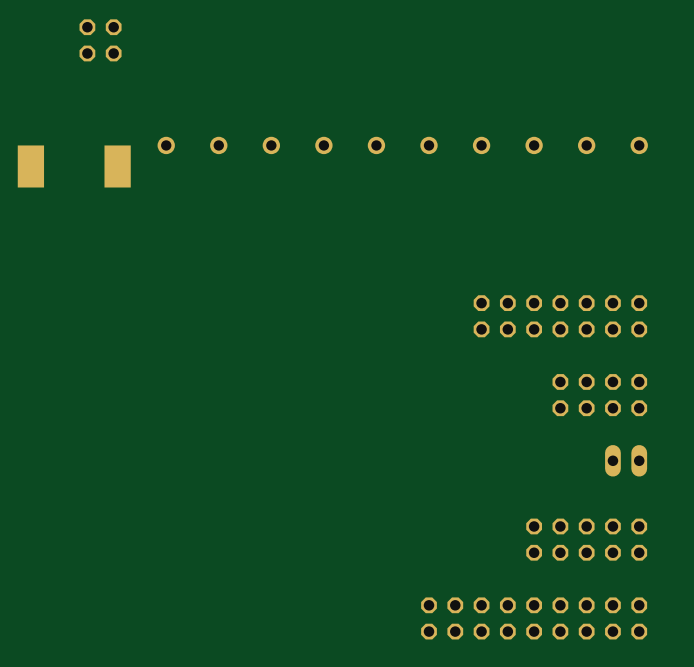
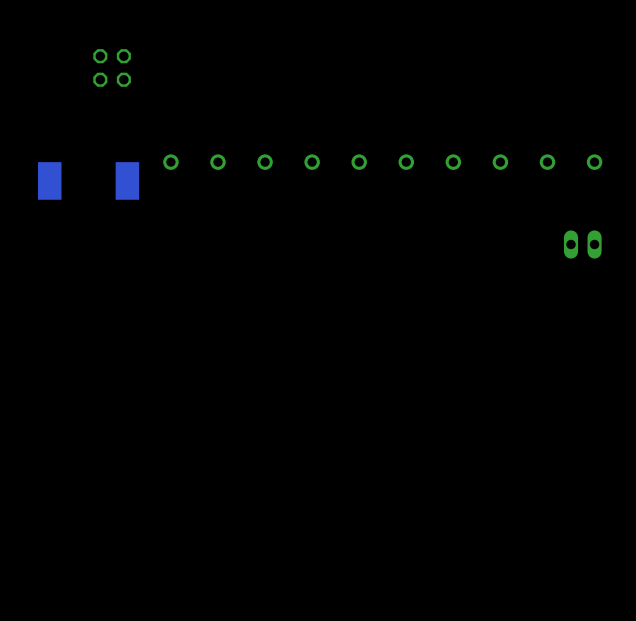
part: (560, 316) -> none
part: (599, 395) -> none
part position: (626, 460) -> (582, 244)
part: (586, 539) -> none
part: (534, 618) -> none

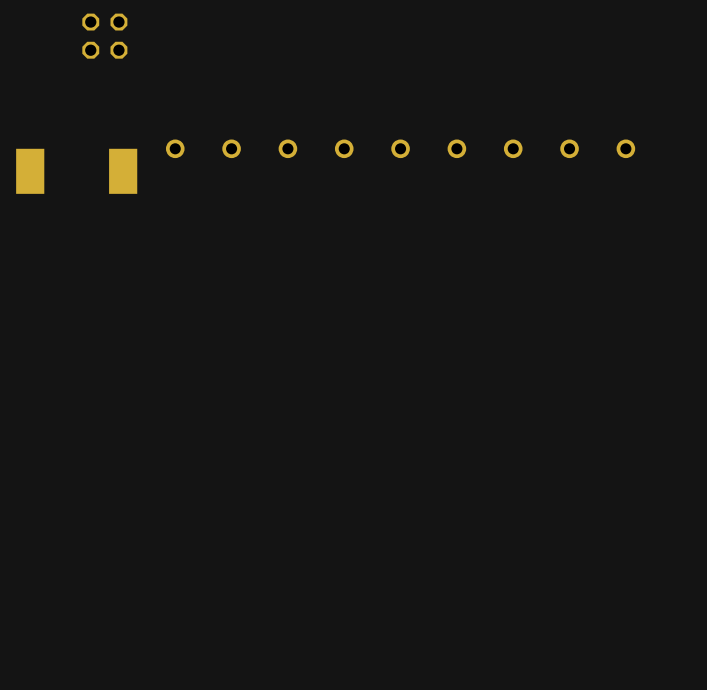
part: (594, 162) -> none
part: (582, 244) -> none

